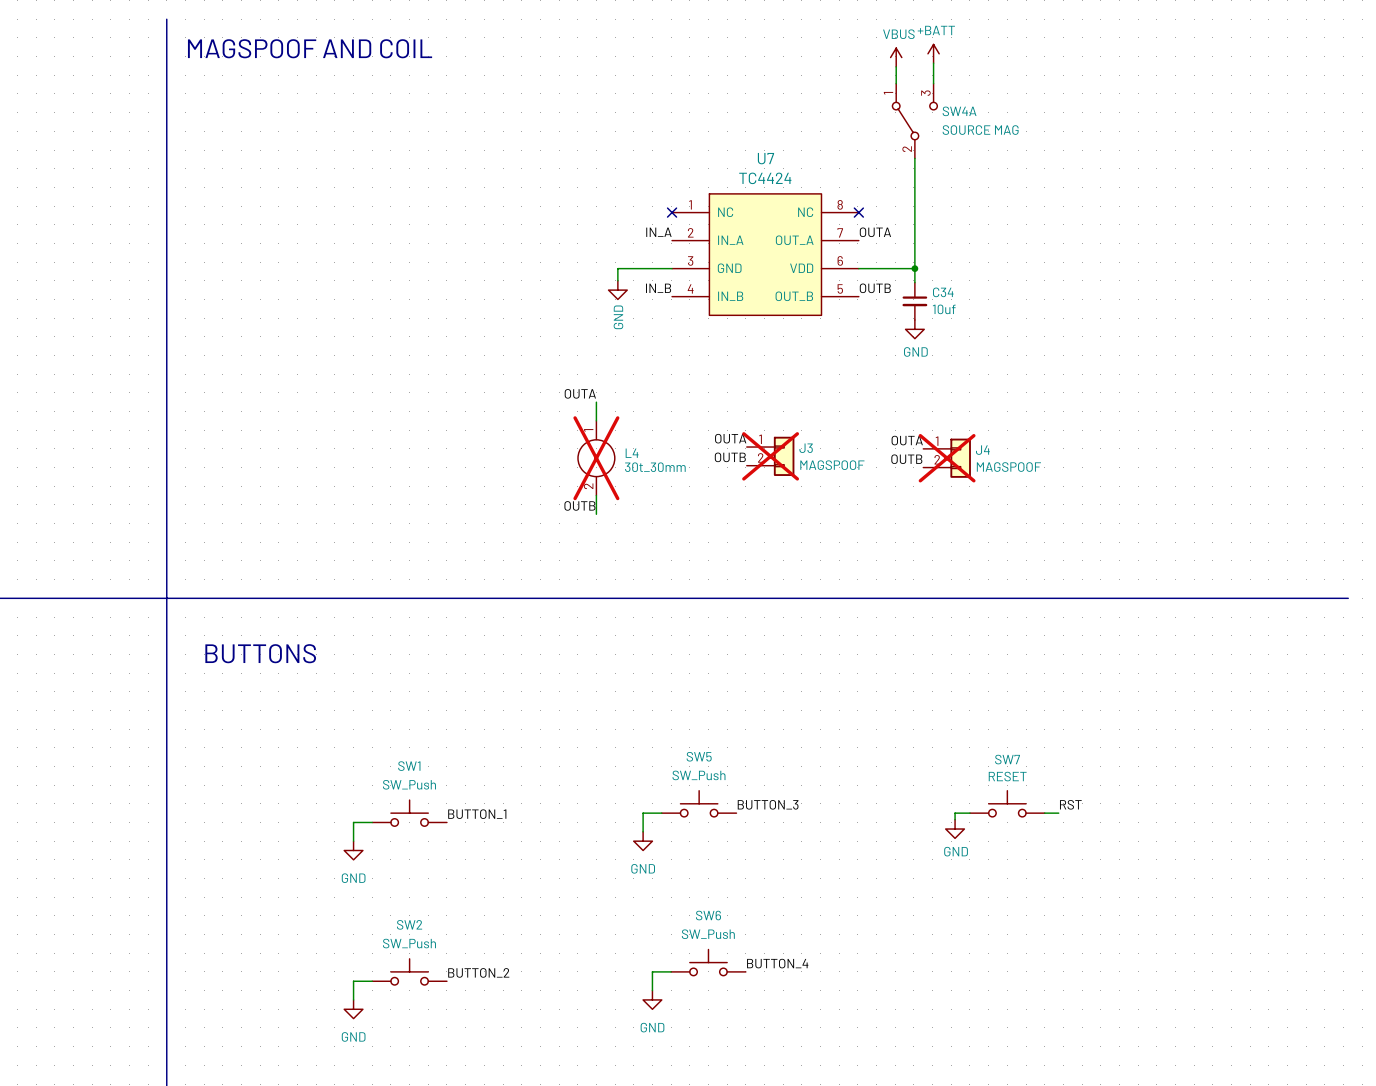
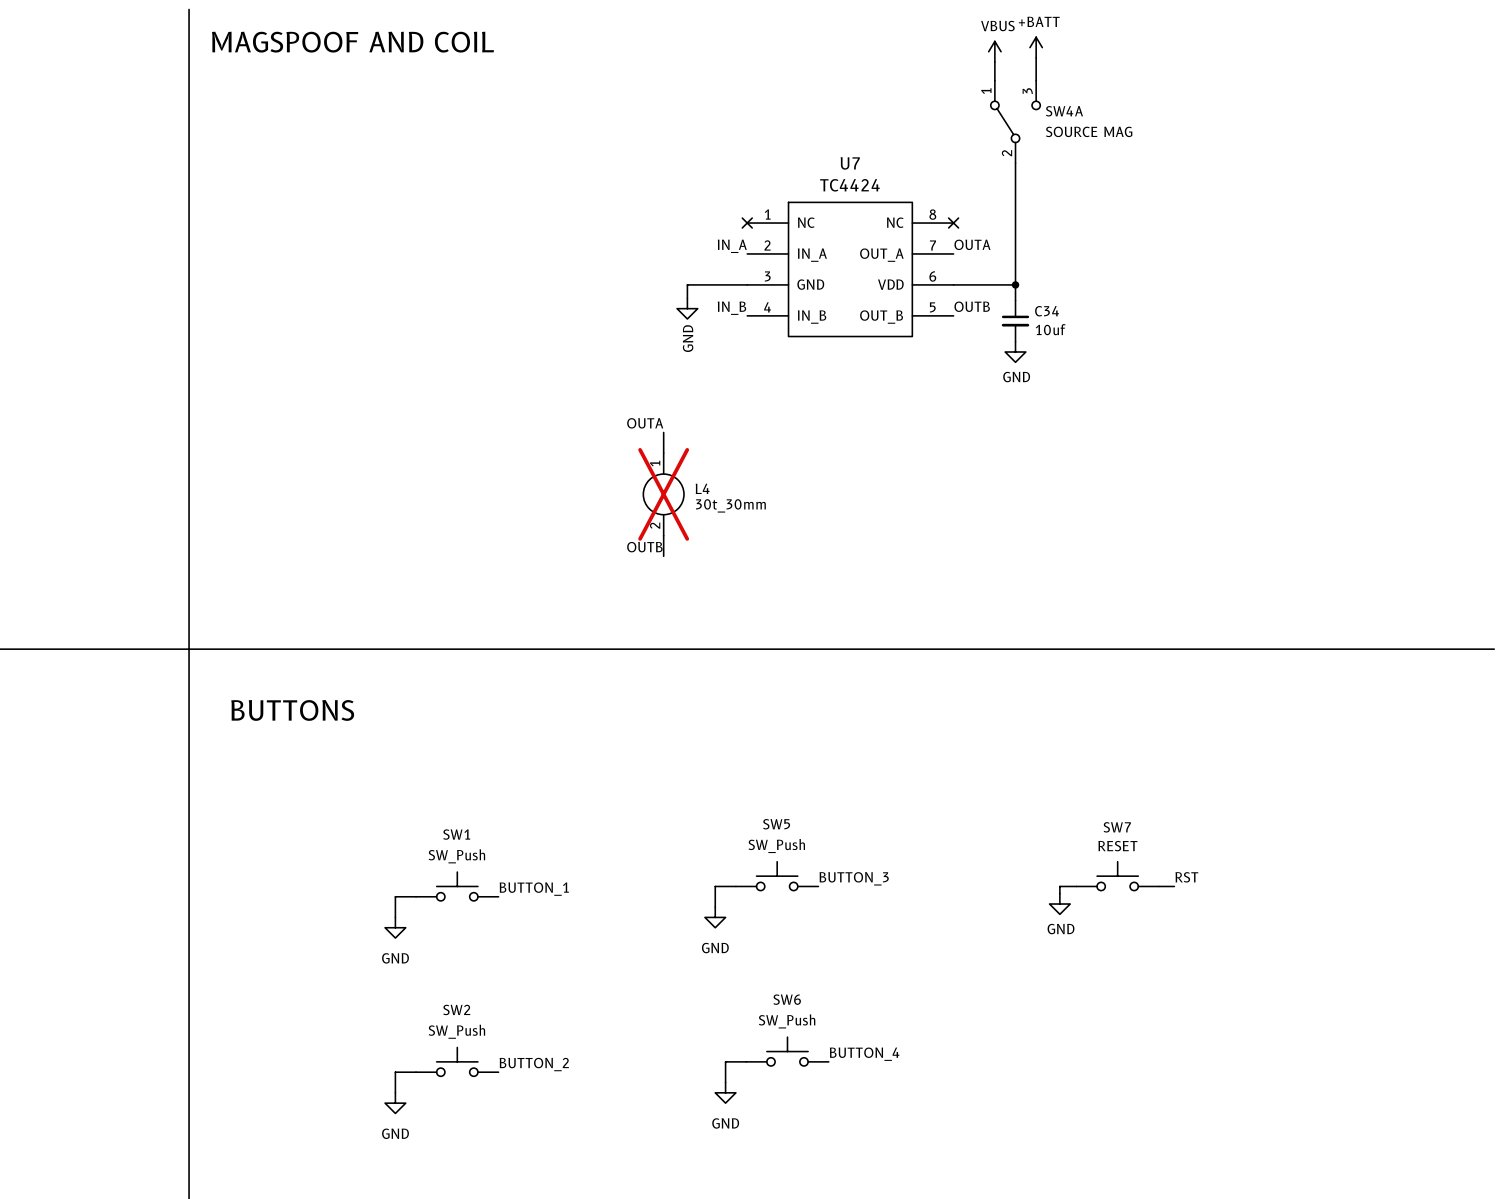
label: OUTA (730, 438) -> none
label: OUTA (907, 440) -> none
J3: MAGSPOOF (770, 456) -> none
label: OUTB (730, 457) -> none
J4: MAGSPOOF (947, 458) -> none
label: OUTB (906, 459) -> none

